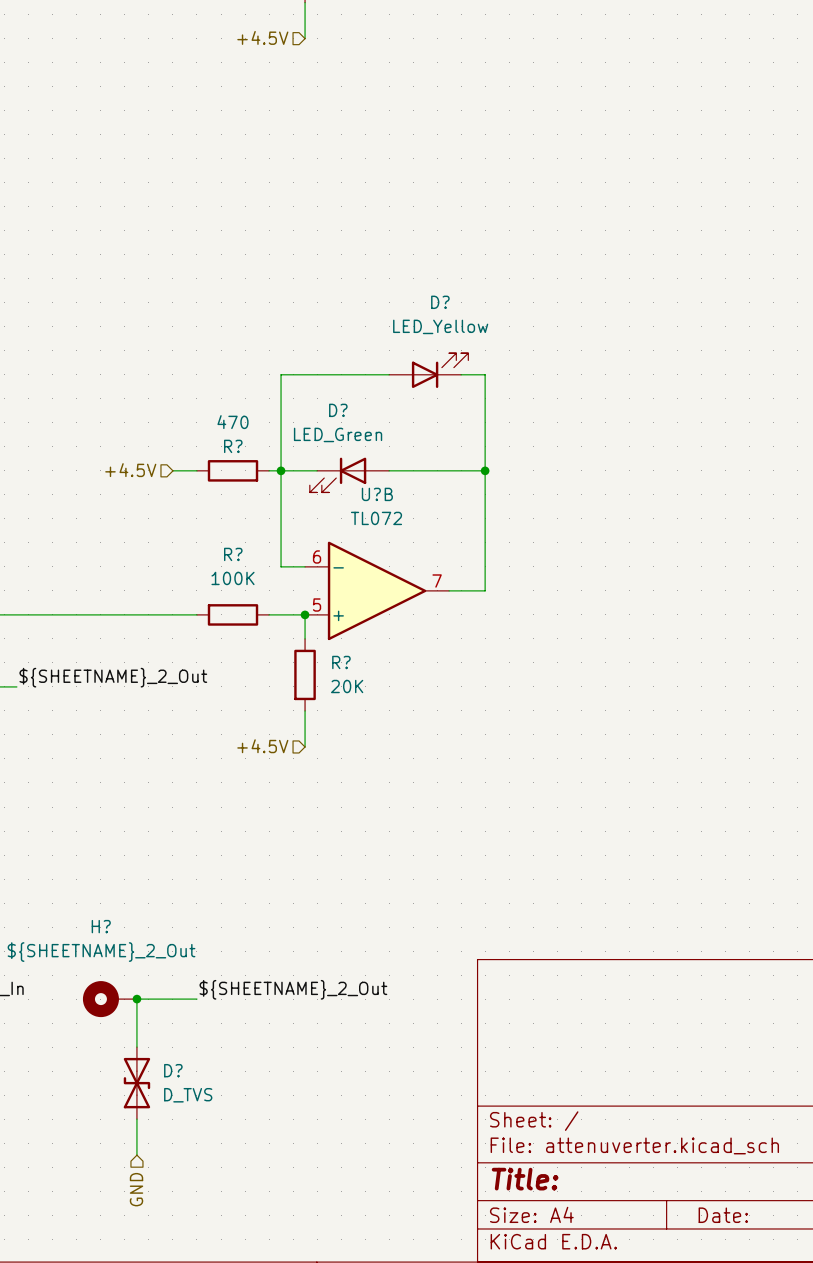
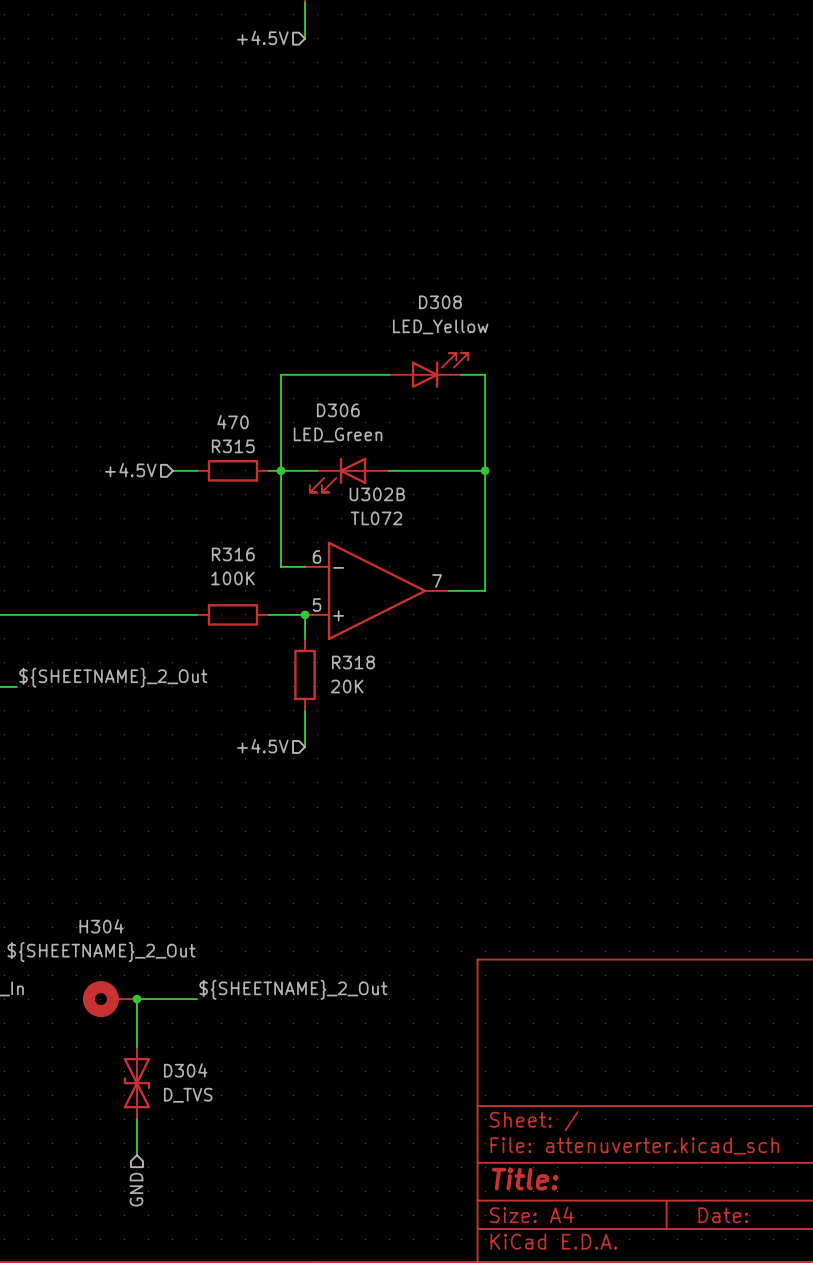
D? name: D? (440, 302) -> D308 (440, 302)
D? name: D? (338, 410) -> D306 (338, 410)
R? name: R? (233, 446) -> R315 (233, 446)
U?B name: U?B (377, 494) -> U302B (377, 494)
R? name: R? (233, 554) -> R316 (233, 554)
R? name: R? (341, 662) -> R318 (353, 662)
H? name: H? (101, 926) -> H304 (101, 926)
D? name: D? (173, 1070) -> D304 (185, 1070)

